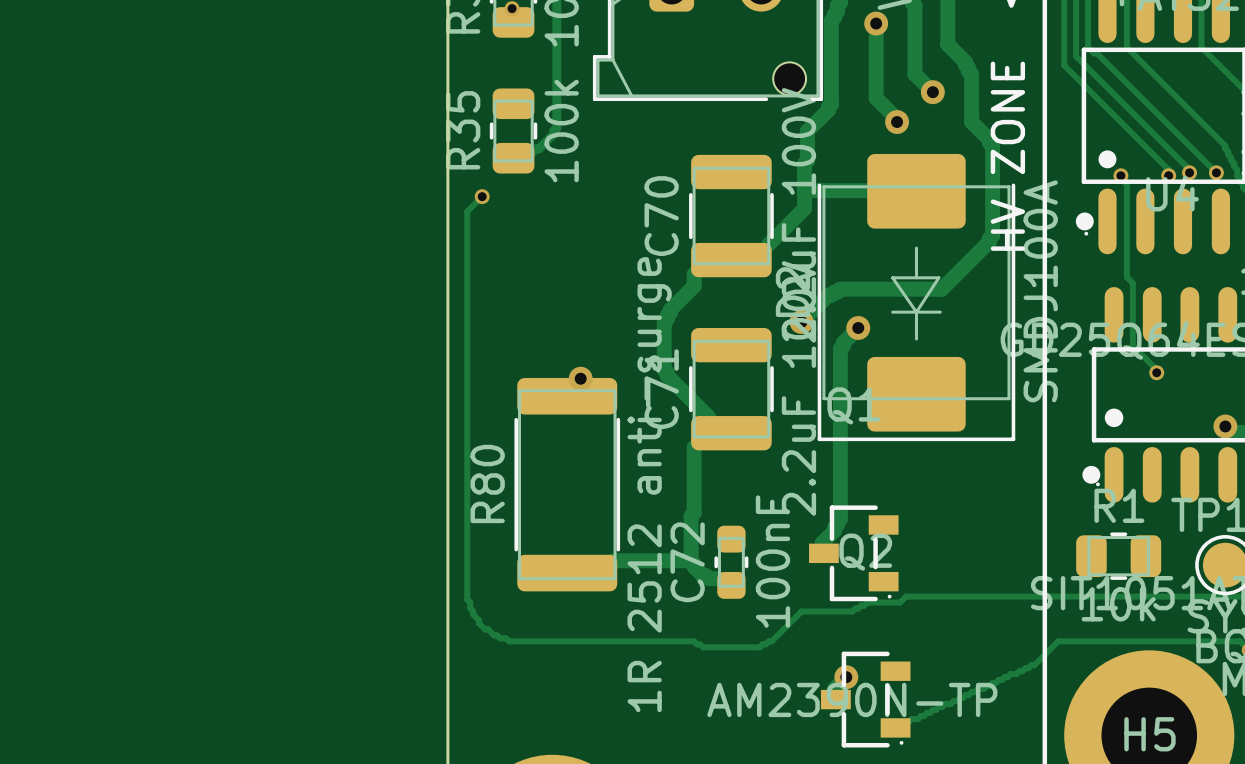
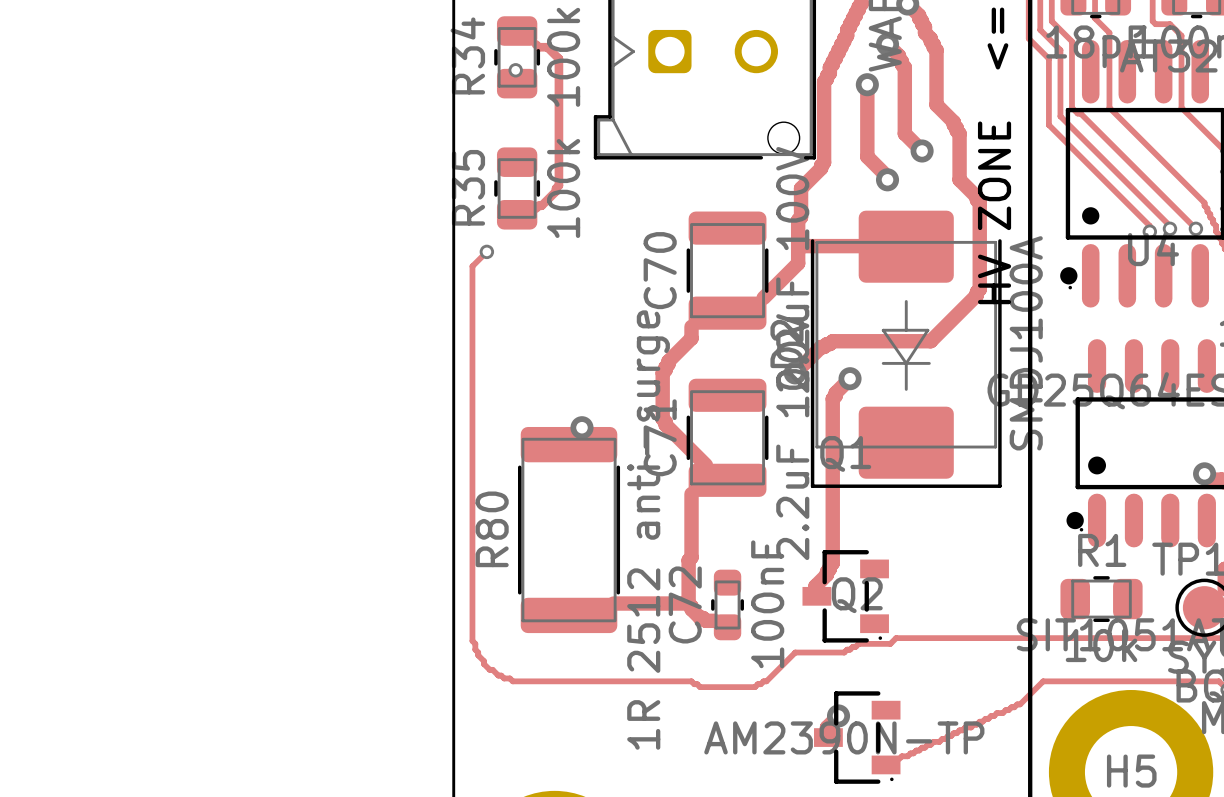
track: (1120, 175) (1120, 178) (1126, 184) (1126, 277) (1132, 283) (1132, 345) (1153, 366) (1156, 372) -> none
via: (1120, 175) -> none
via: (1156, 372) -> none

